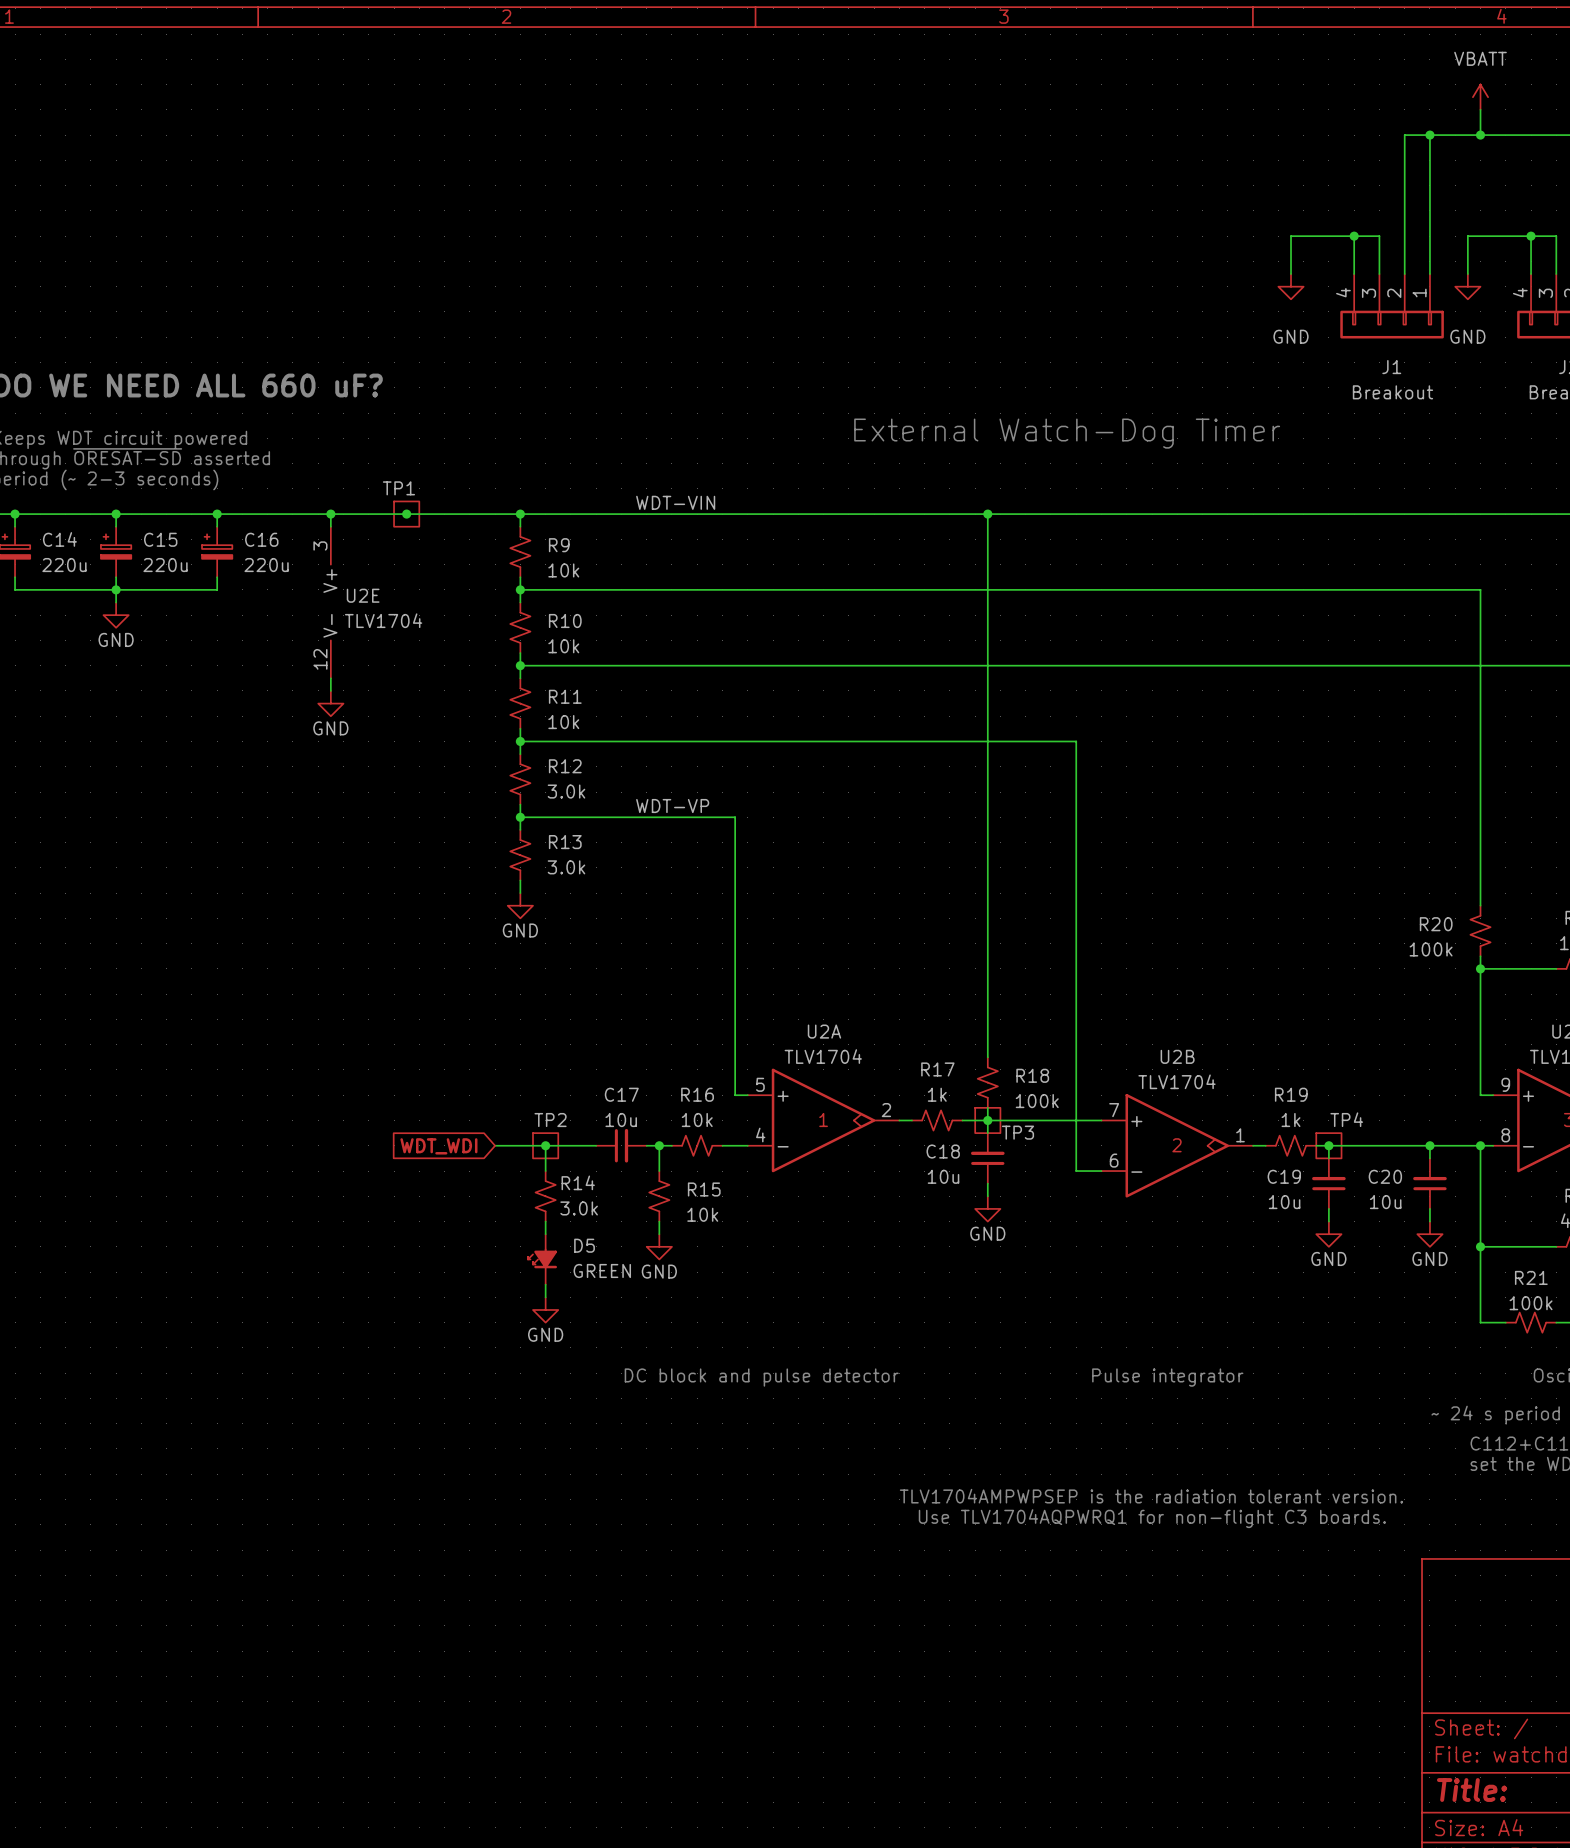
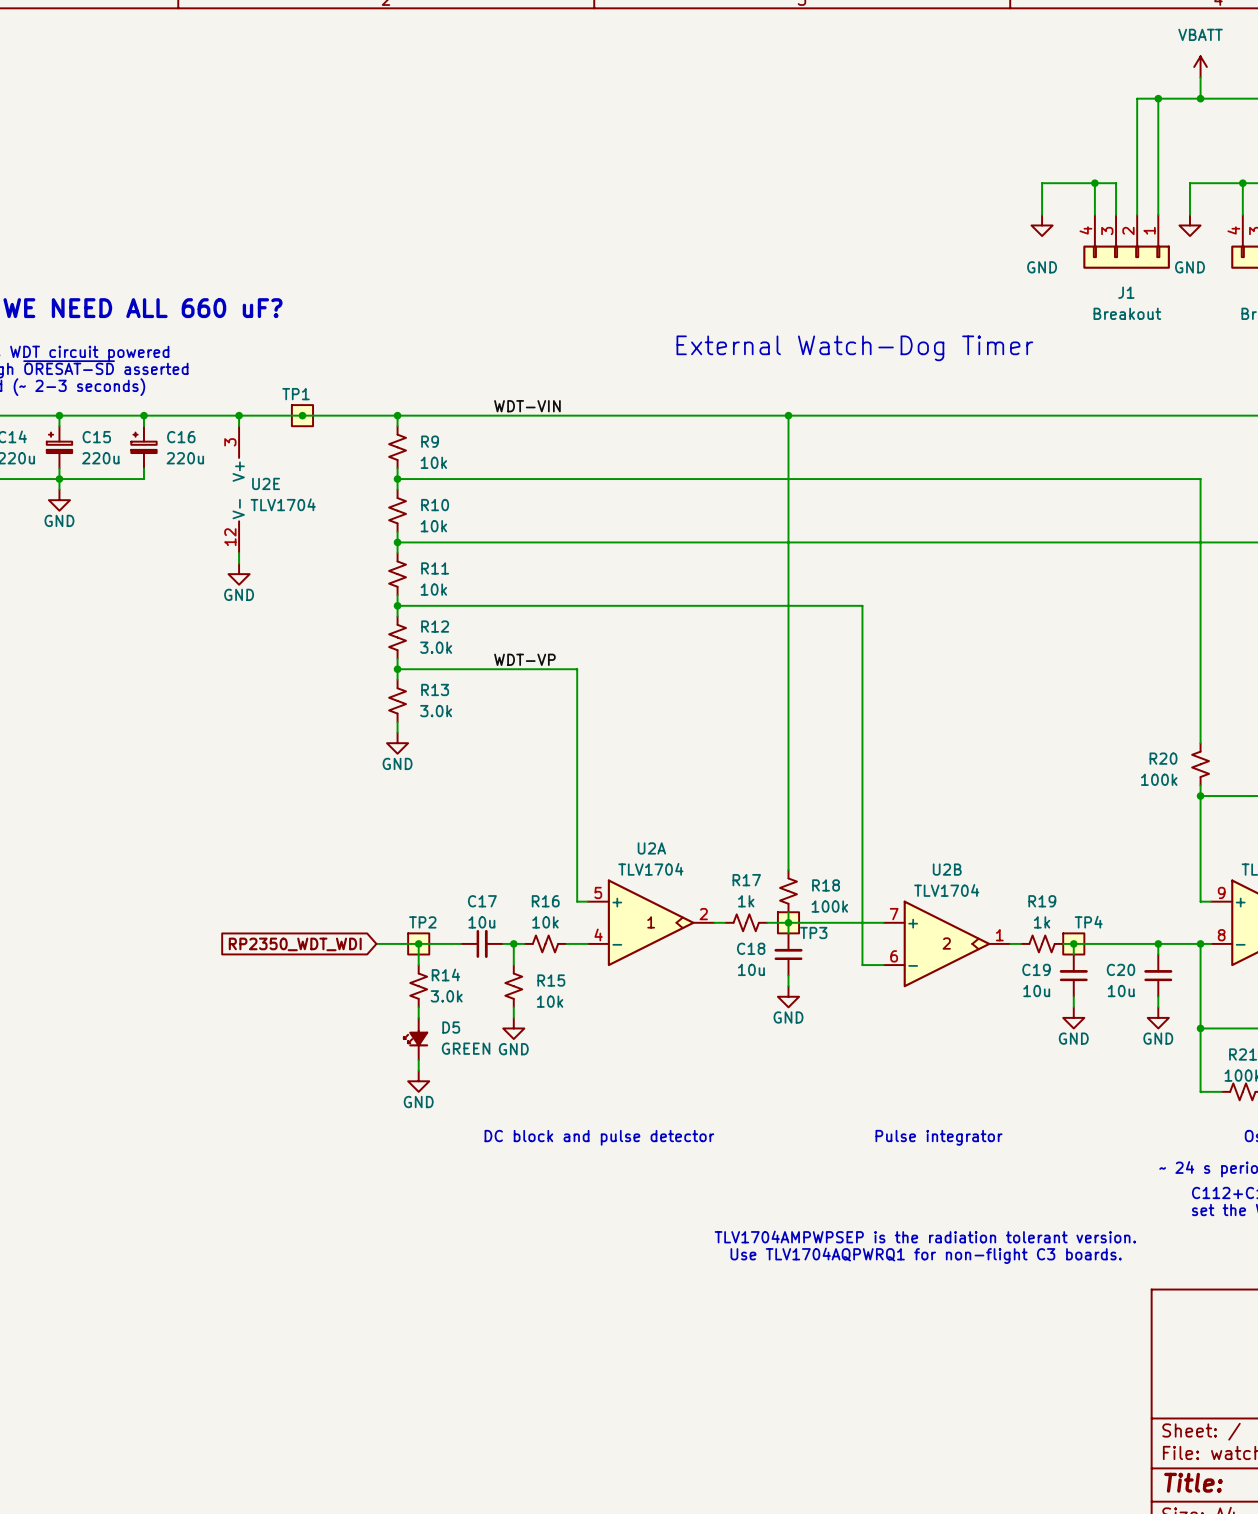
global label: WDT_WDI (438, 1146) -> RP2350_WDT_WDI (295, 944)

